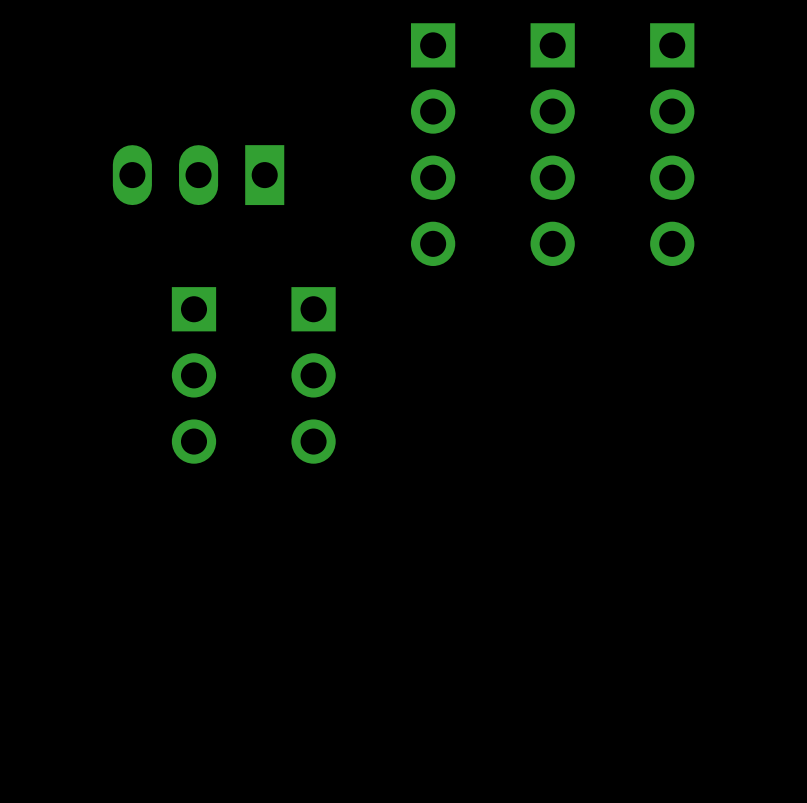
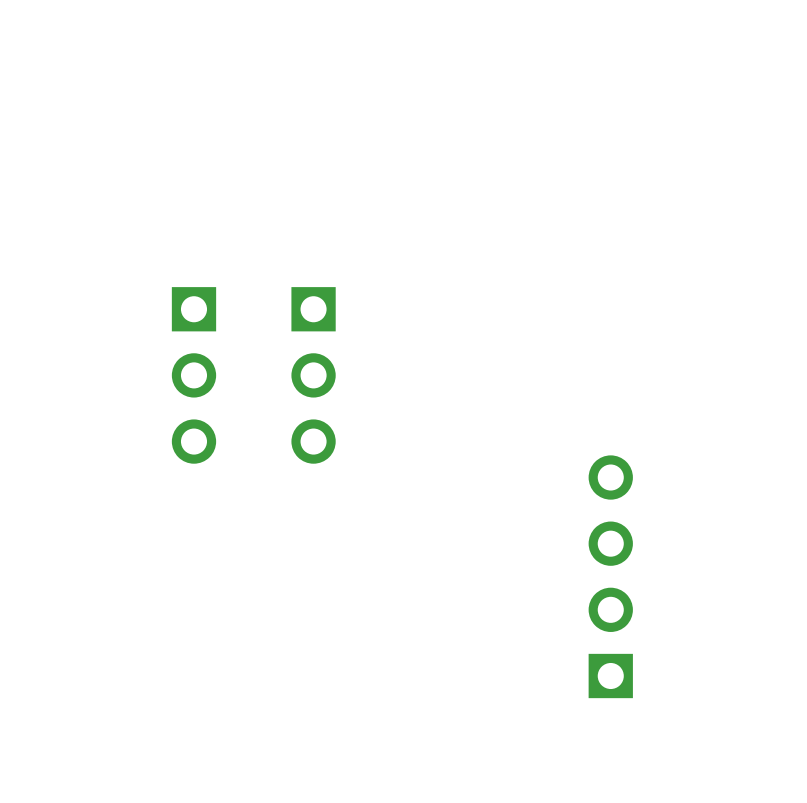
part: (433, 144) -> none
part: (552, 144) -> none
part: (672, 144) -> none
part: (198, 175) -> none
part: none -> (610, 576)

